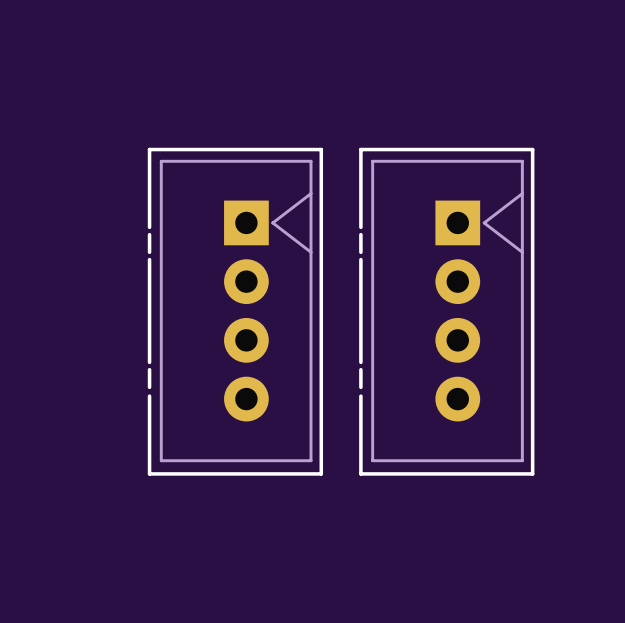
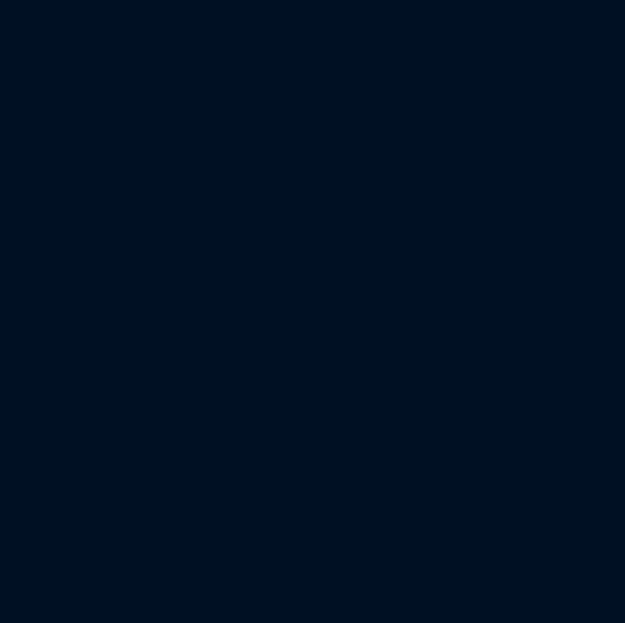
part: (235, 311) -> none
part: (446, 311) -> none

